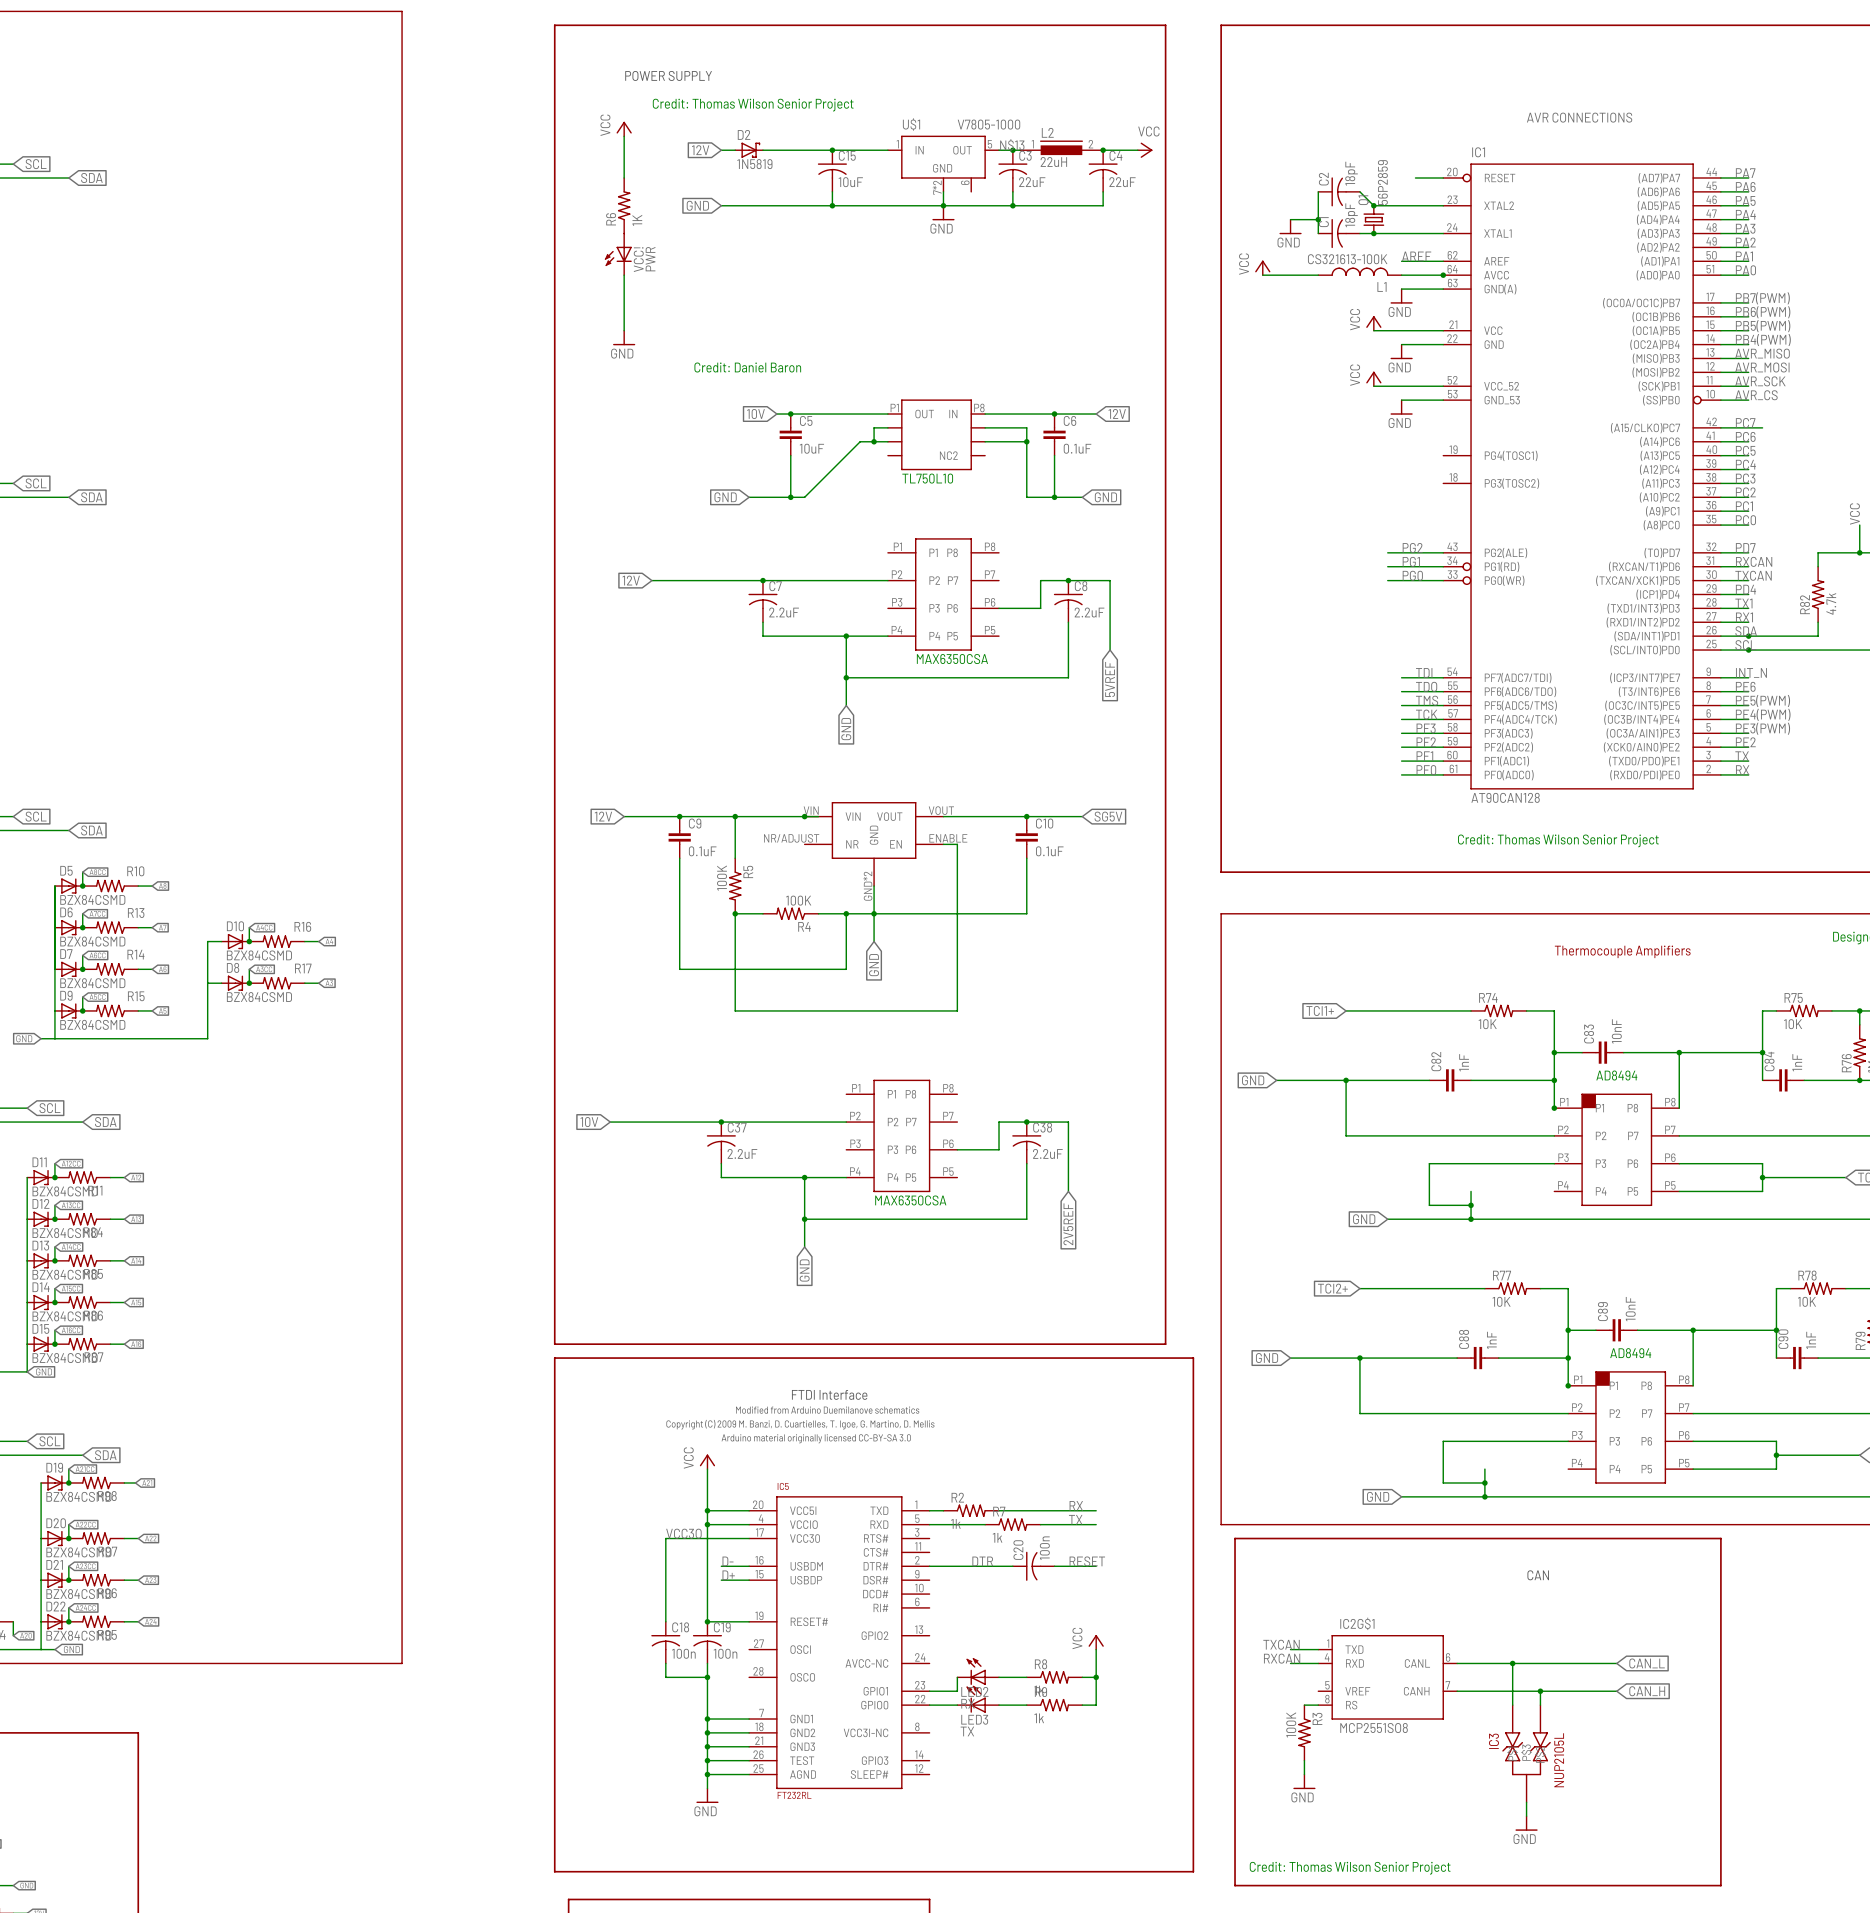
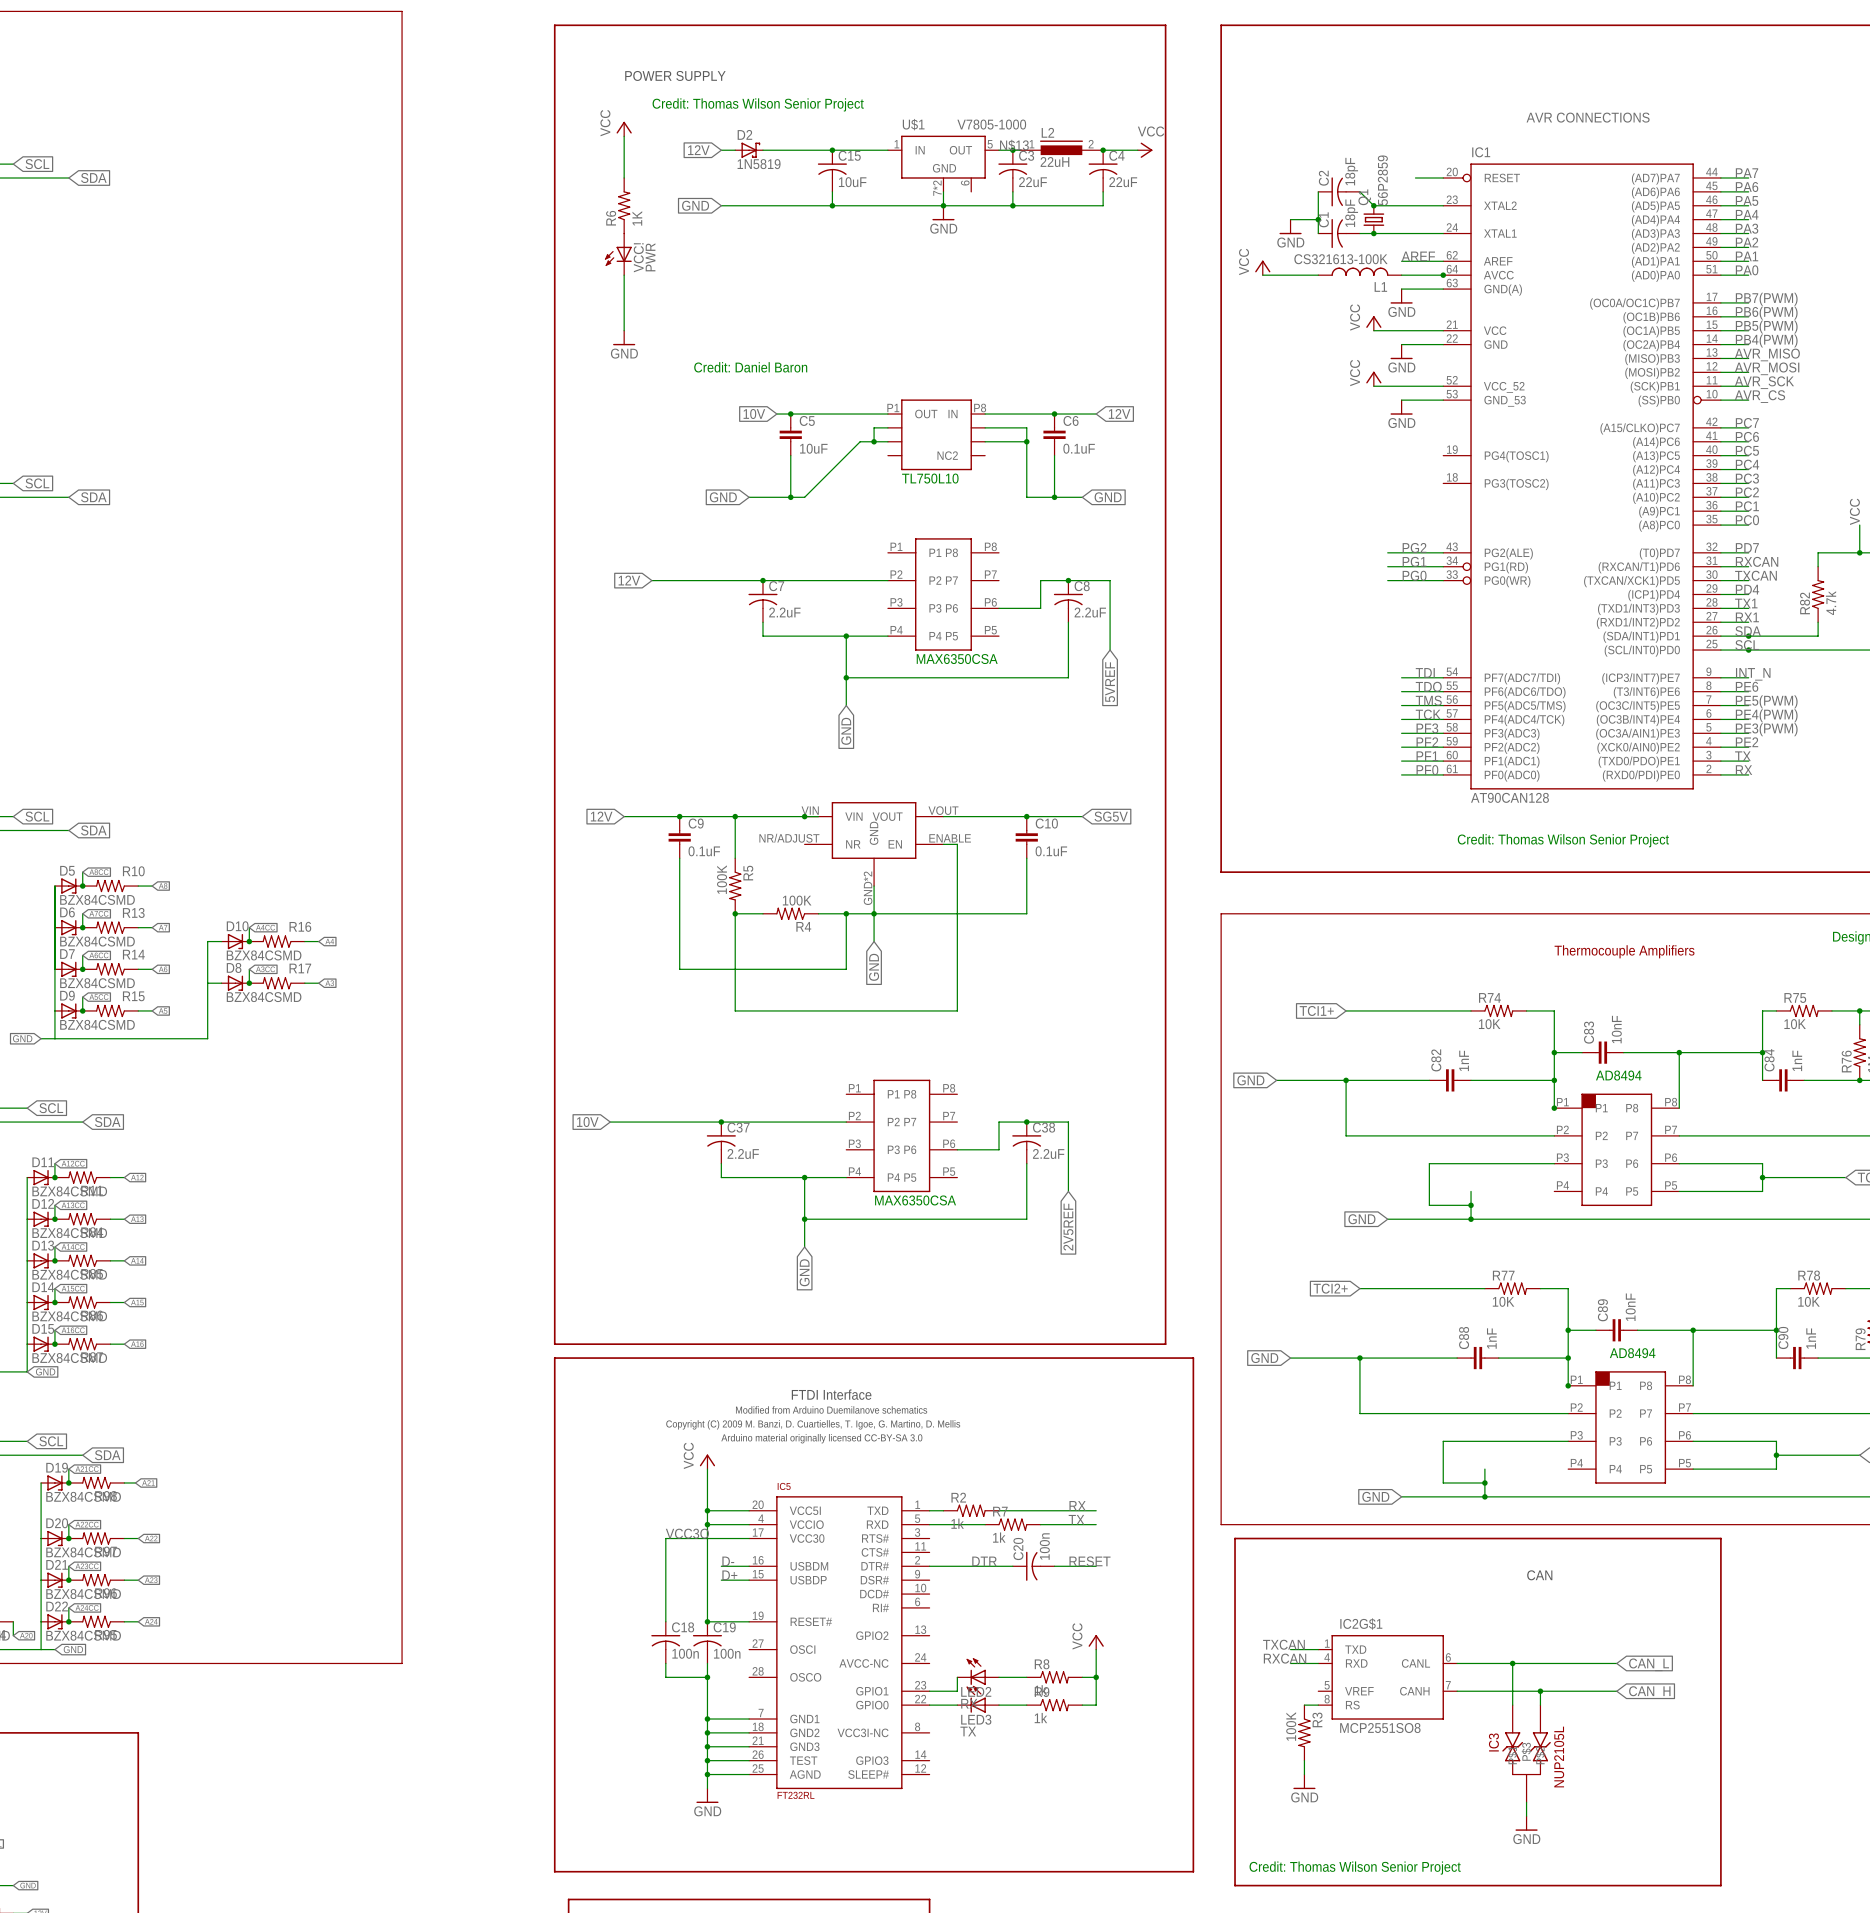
wire: (1748, 427) (1762, 427) -> none

